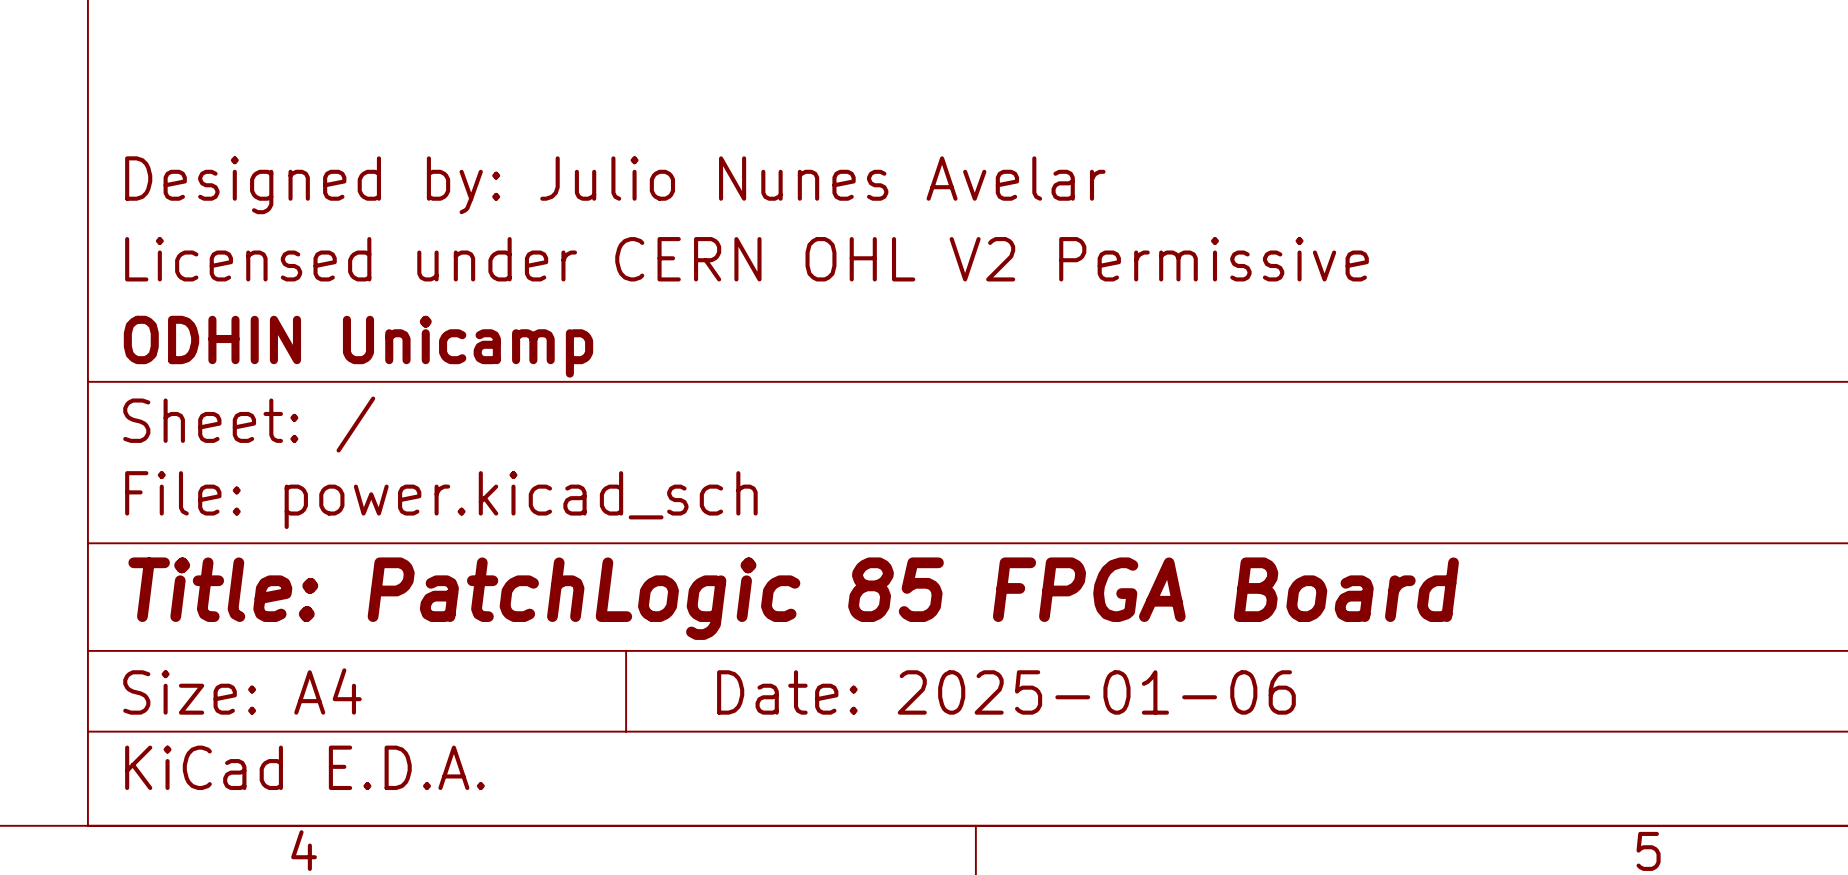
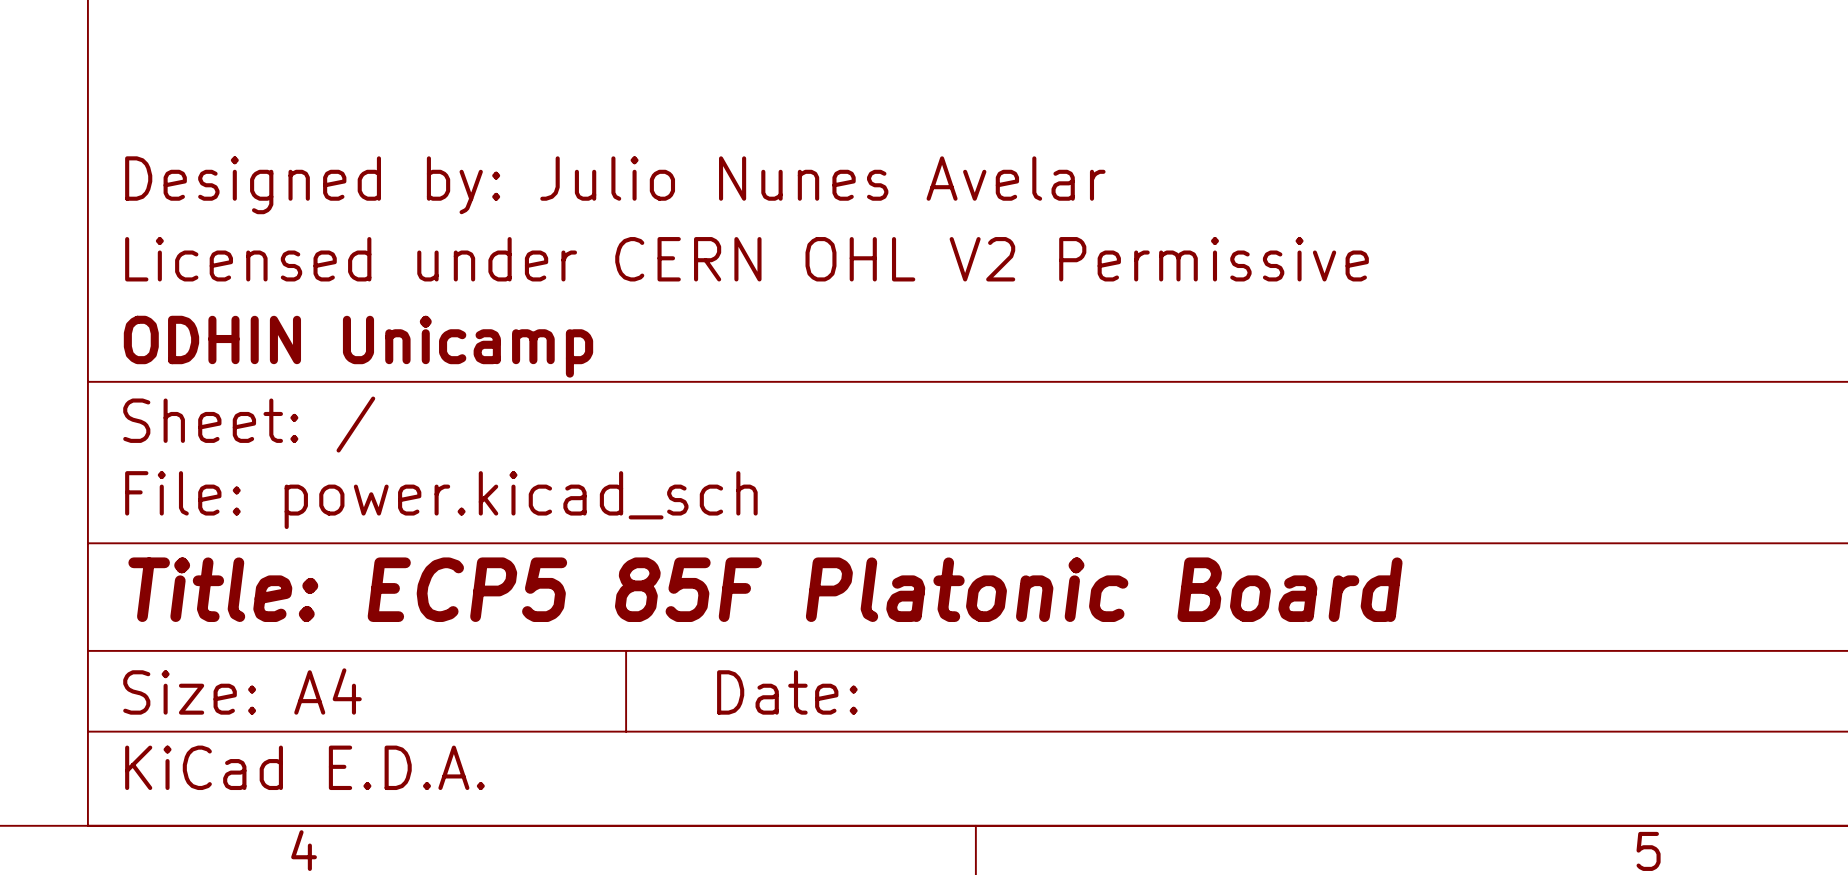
title block: Title: PatchLogic 85 FPGA Board (793, 598) -> Title: ECP5 85F Platonic Board (765, 589)
title block: Date: 2025-01-06 (1006, 692) -> Date: (787, 692)

